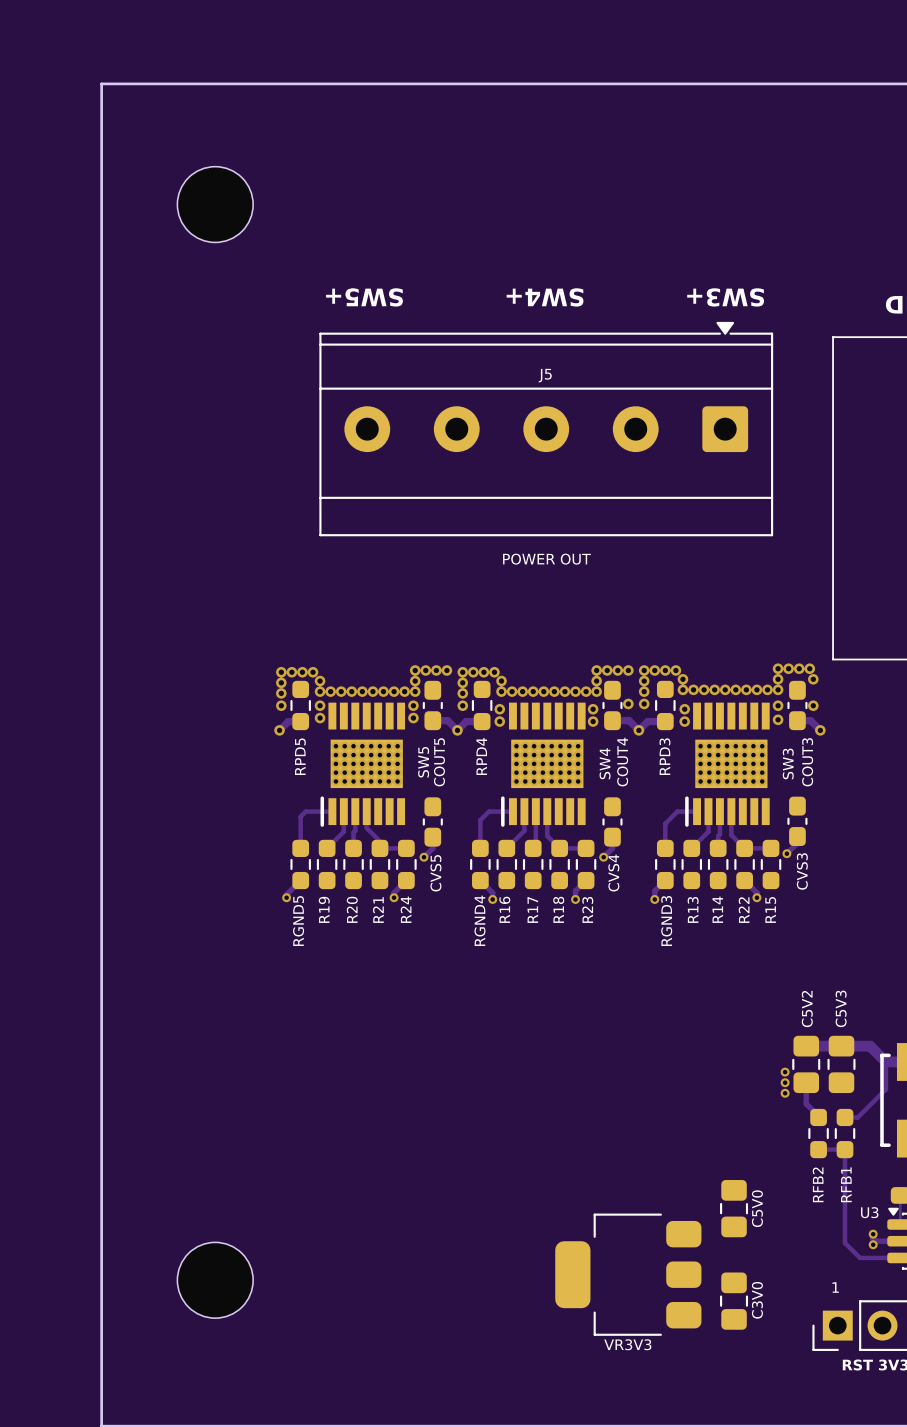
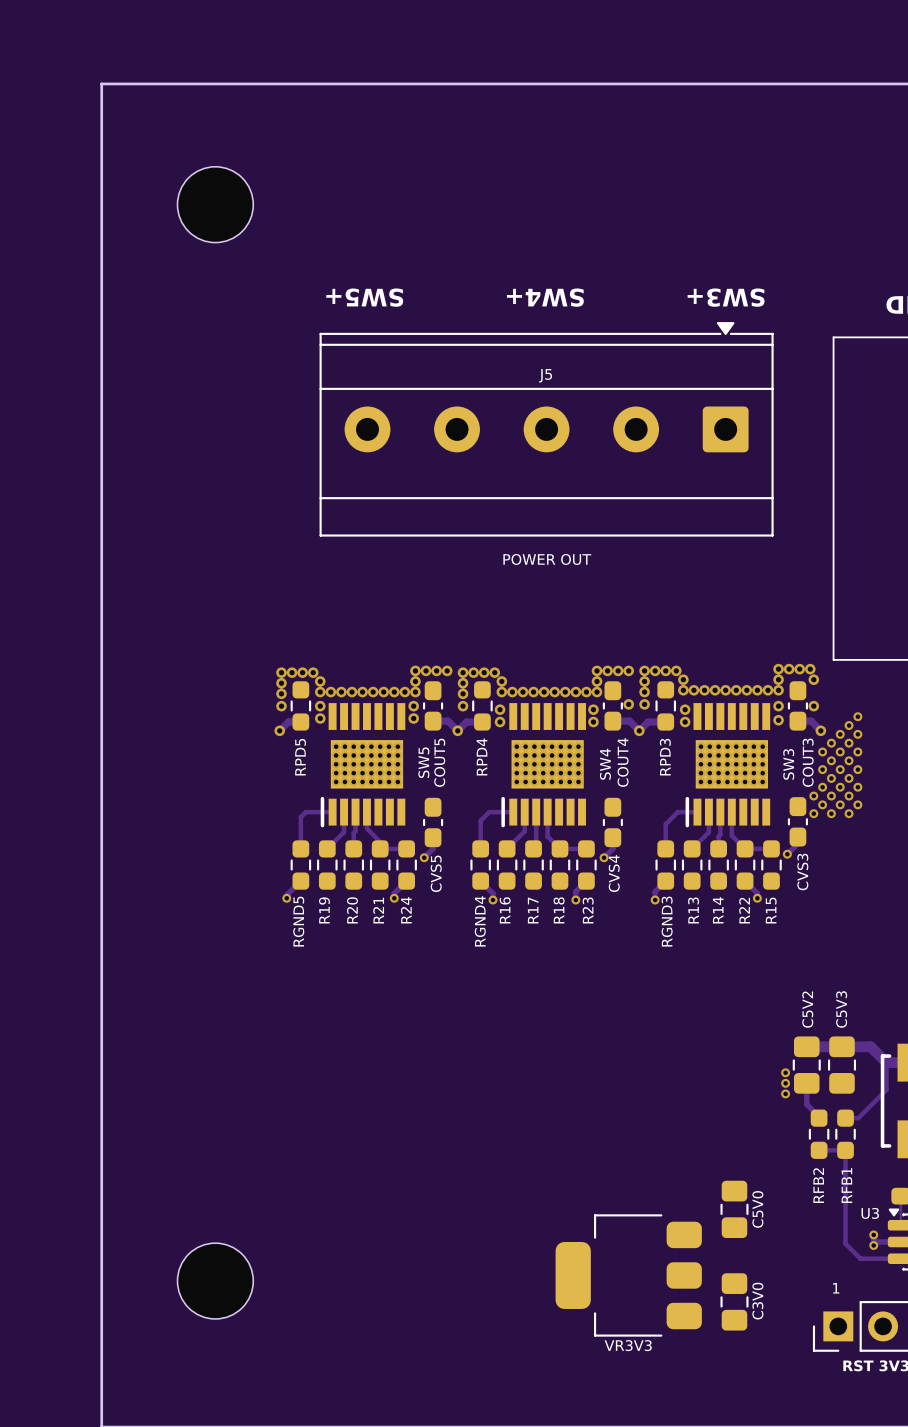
via: none -> (857, 716)
via: none -> (849, 725)
via: none -> (840, 734)
via: none -> (857, 734)
via: none -> (831, 743)
via: none -> (849, 743)
via: none -> (822, 751)
via: none -> (840, 751)
via: none -> (857, 751)
via: none -> (831, 760)
via: none -> (849, 760)
via: none -> (822, 769)
via: none -> (840, 769)
via: none -> (857, 769)
via: none -> (831, 778)
via: none -> (849, 778)
via: none -> (822, 787)
via: none -> (840, 787)
via: none -> (857, 787)
via: none -> (813, 796)
via: none -> (831, 796)
via: none -> (849, 796)
via: none -> (822, 804)
via: none -> (840, 804)
via: none -> (857, 804)
via: none -> (813, 813)
via: none -> (831, 813)
via: none -> (849, 813)

